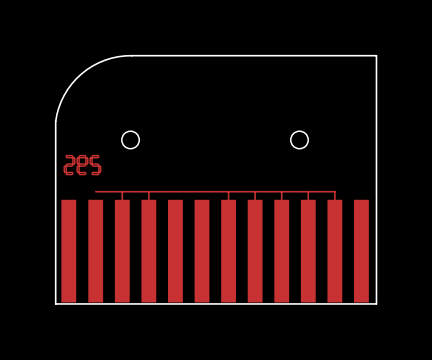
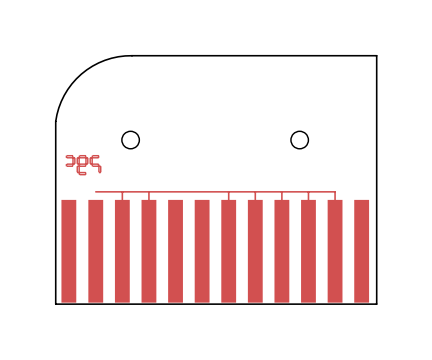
top zone outline: (66, 166) (64, 166) (64, 172) (66, 172) (66, 166) -> none
top zone outline: (72, 172) (66, 172) (66, 174) (72, 174) (72, 172) -> none
top zone outline: (98, 172) (92, 172) (92, 174) (98, 174) (98, 172) -> none

